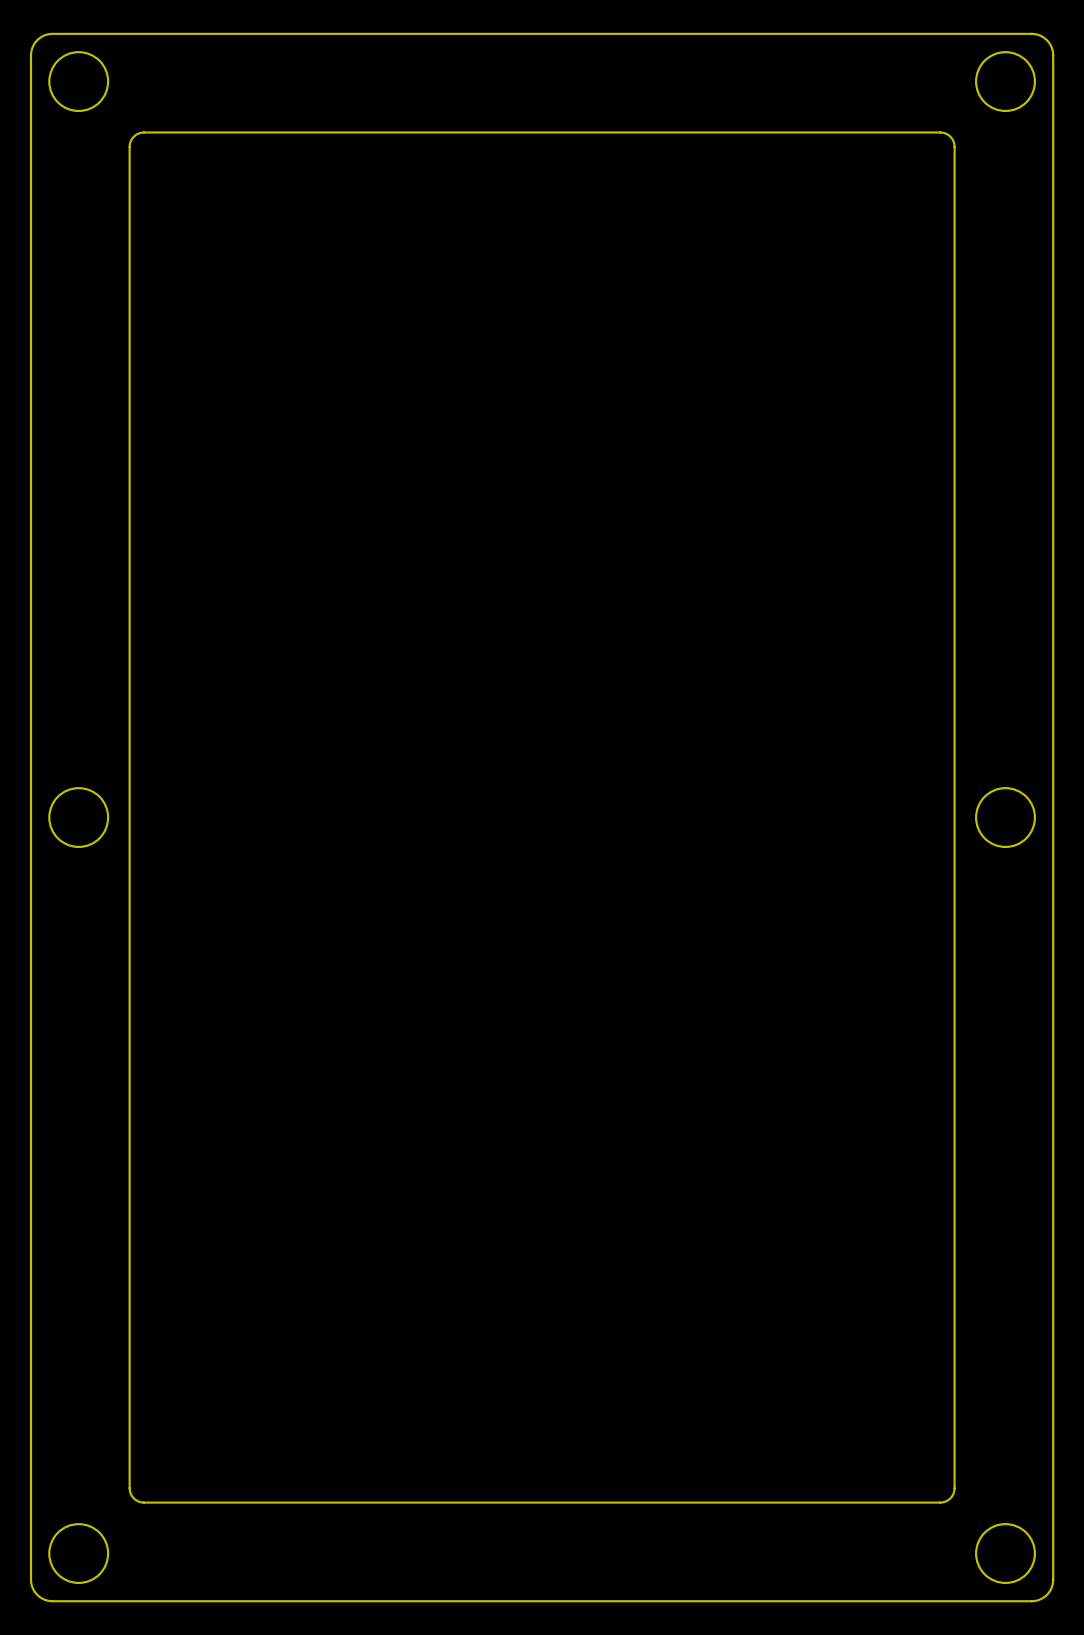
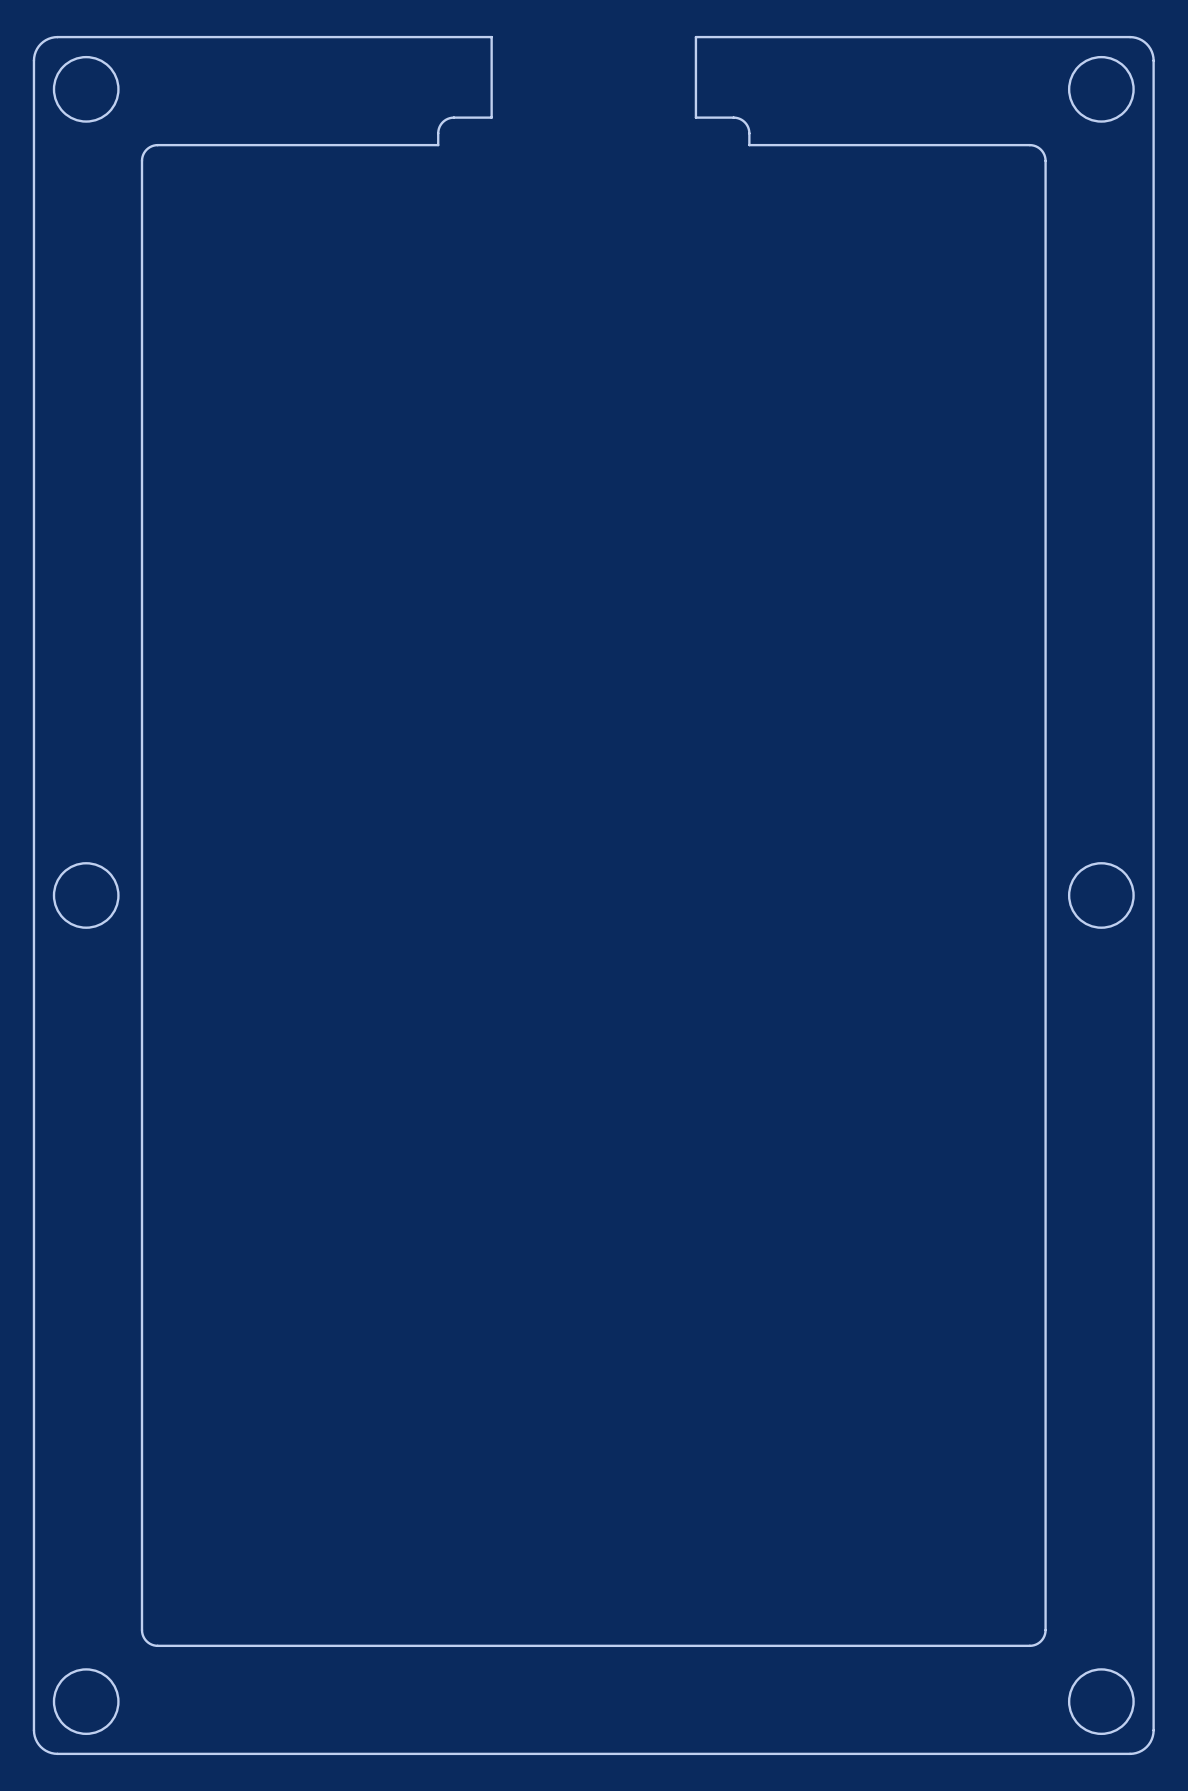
board edge: (635, 33) (448, 33) -> (438, 145) (438, 129) (446, 119) (453, 117) (491, 117) (491, 37)
board edge: (684, 132) (400, 132) -> (749, 145) (748, 129) (741, 119) (733, 117) (695, 117) (695, 37)

